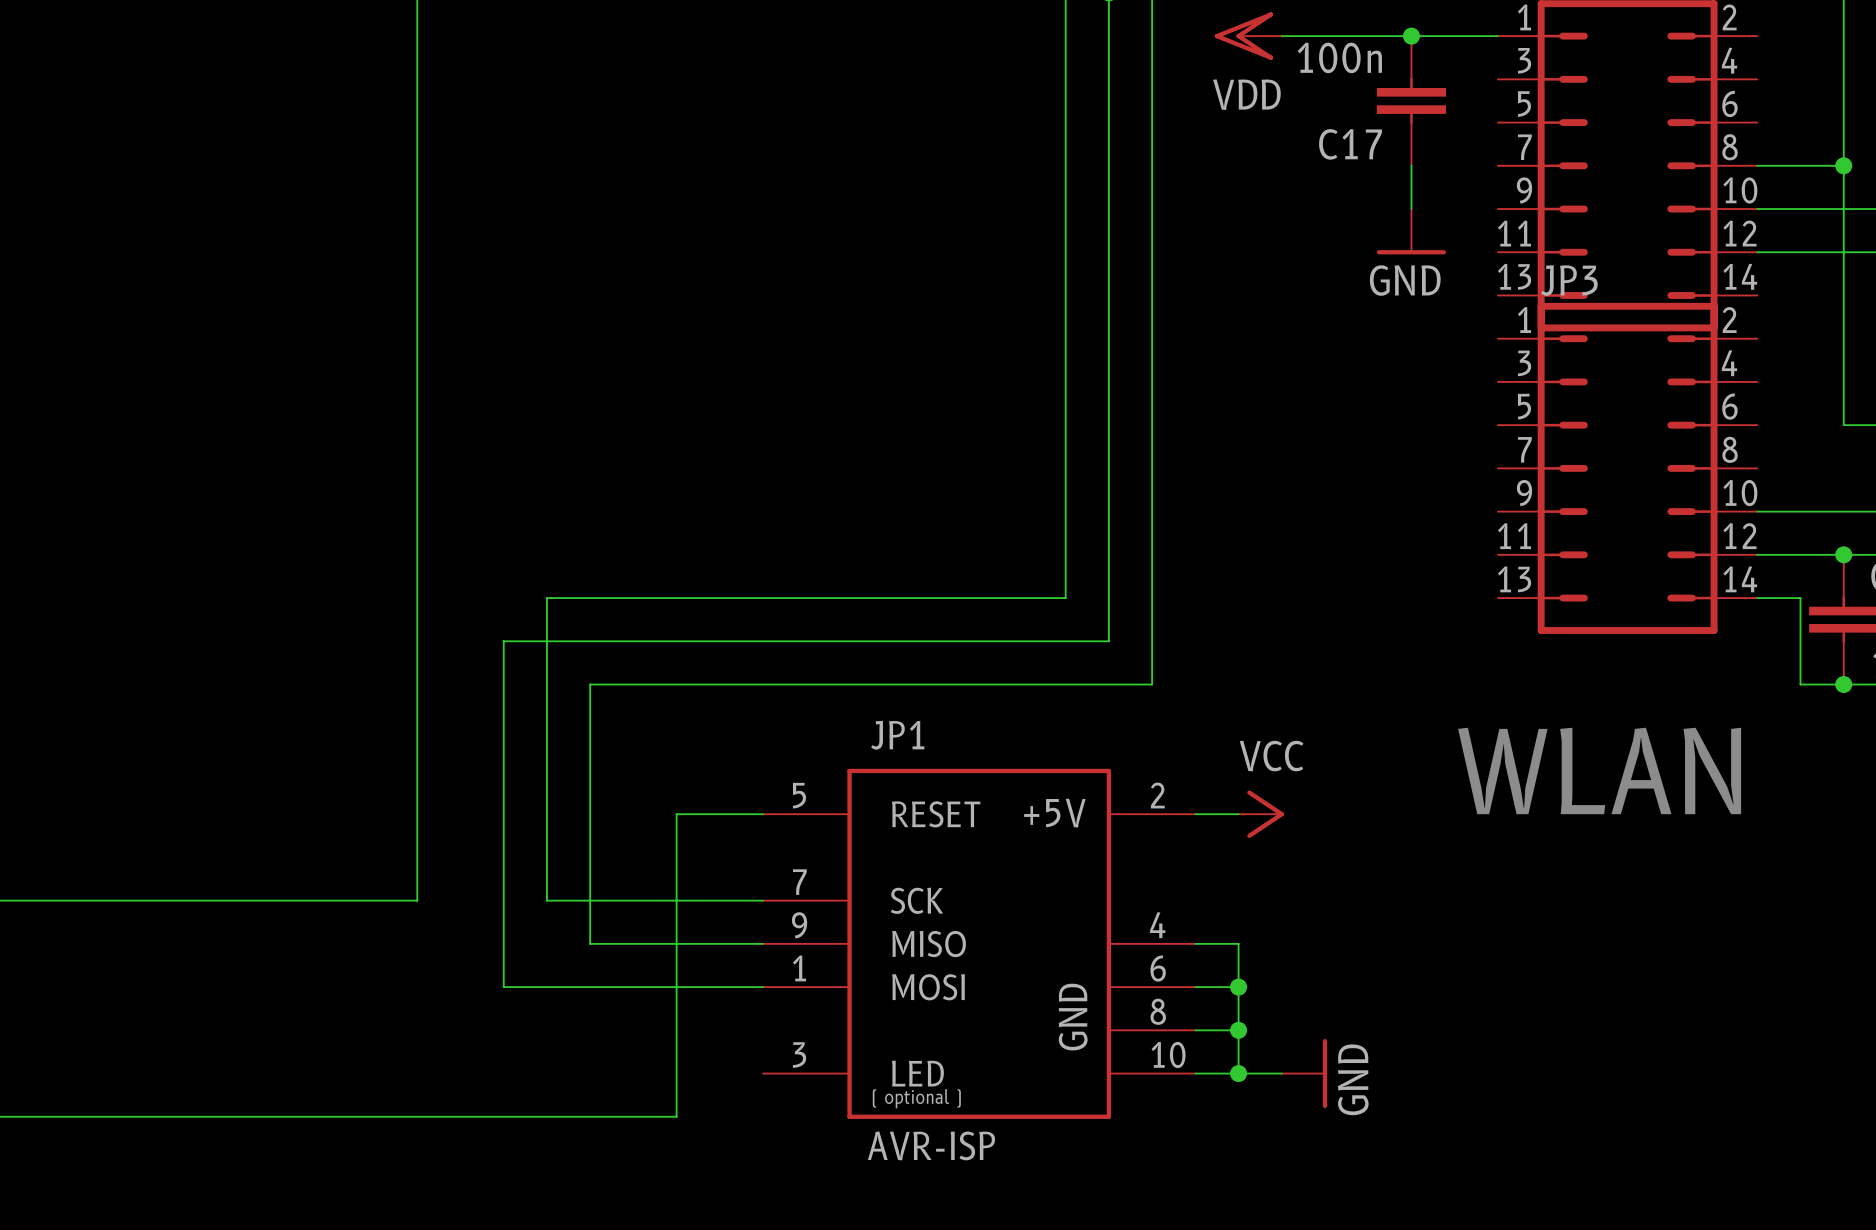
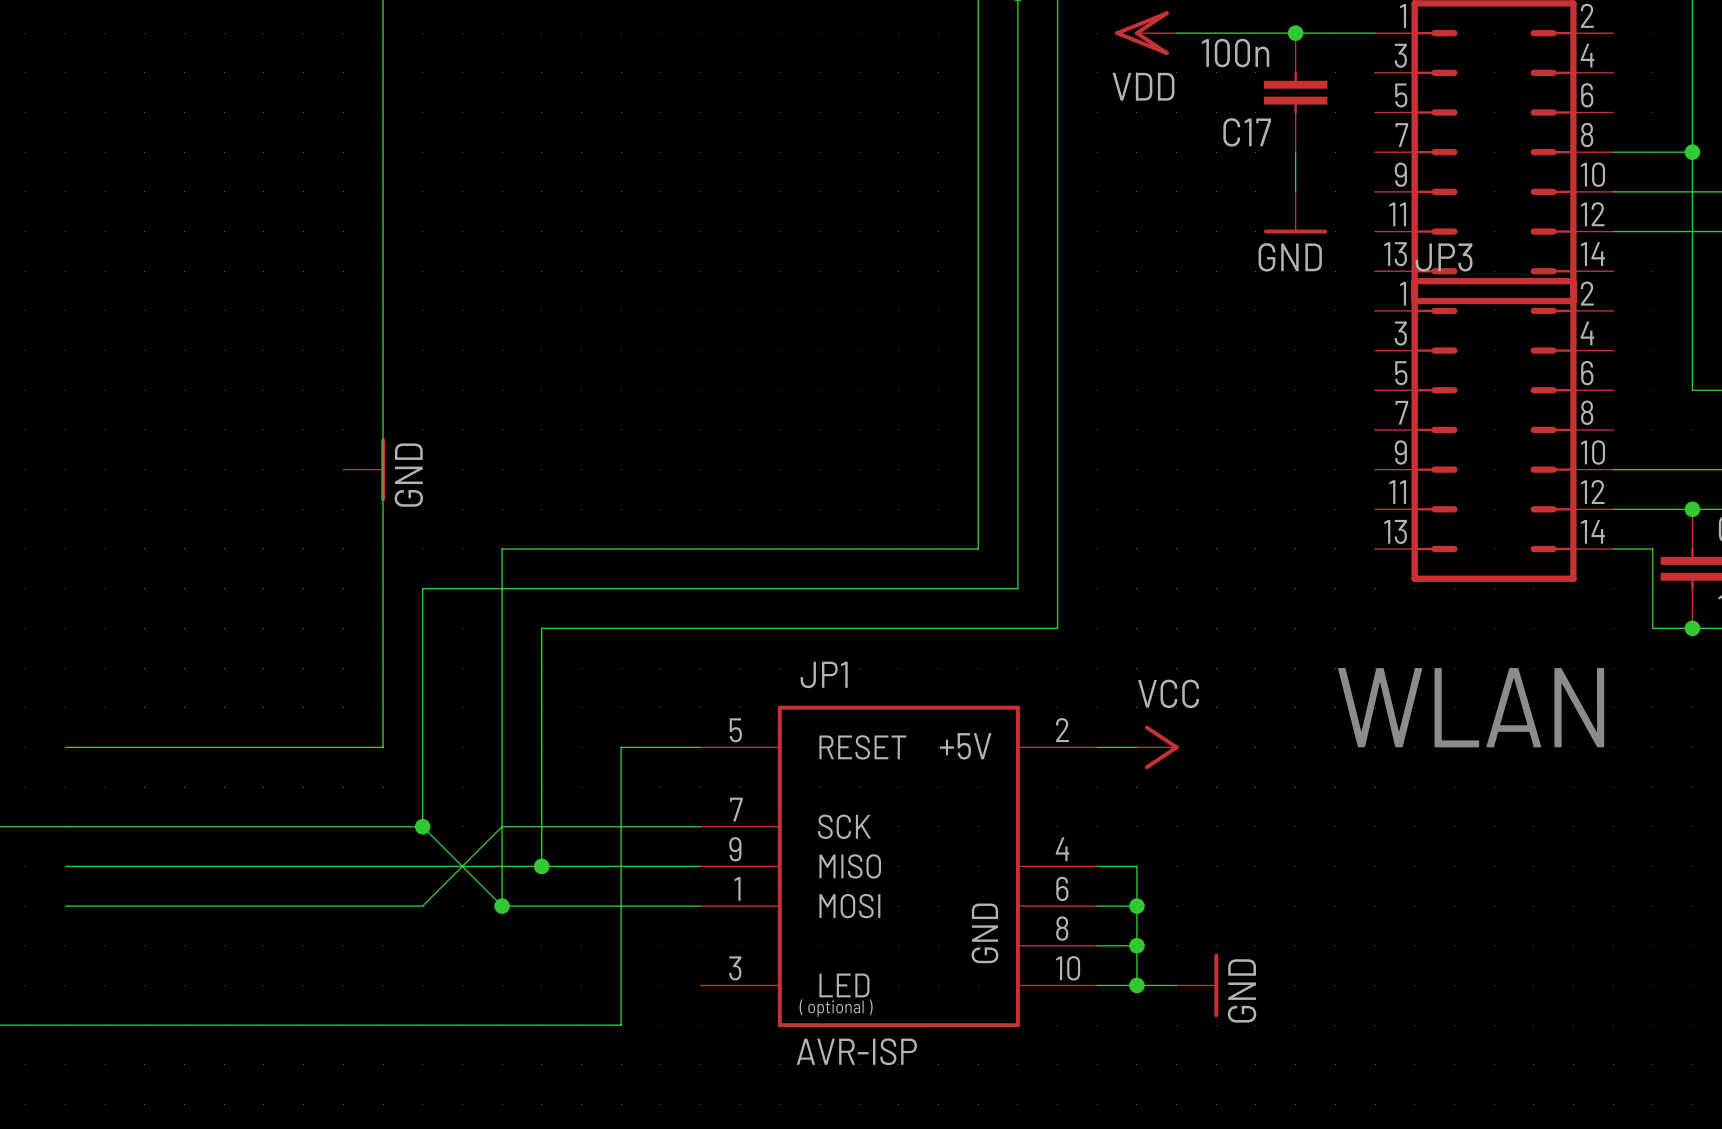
power symbol: none -> GND (364, 469)
wire: (503, 641) (503, 987) (546, 987) -> (462, 588) (422, 588) (422, 826)
wire: none -> (65, 747) (383, 747)
wire: (417, 814) (417, 900) -> (422, 826) (383, 826)
wire: none -> (422, 826) (502, 906) (502, 826) (422, 906) (65, 906)
junction: none -> (422, 826)
wire: none -> (65, 866) (541, 866)
junction: none -> (541, 866)
junction: none -> (502, 906)

